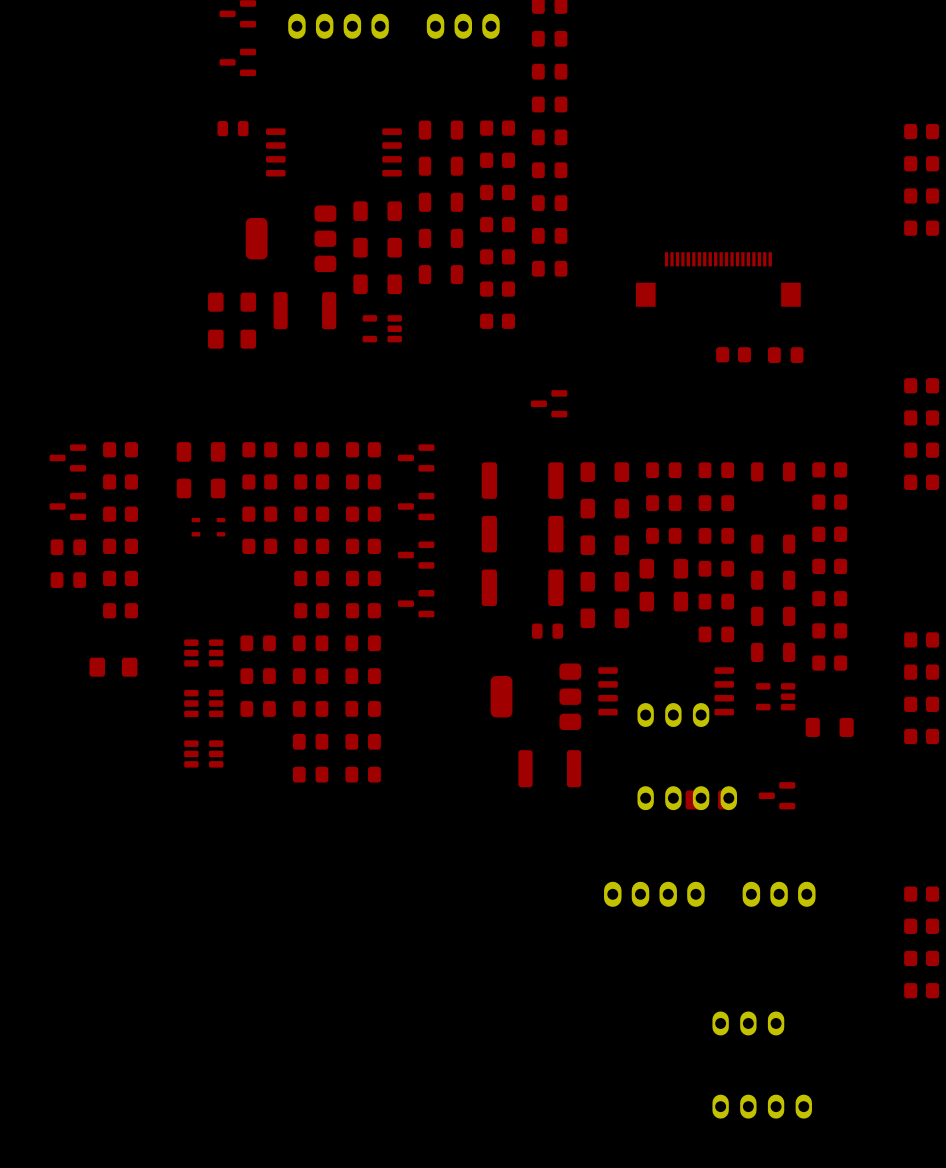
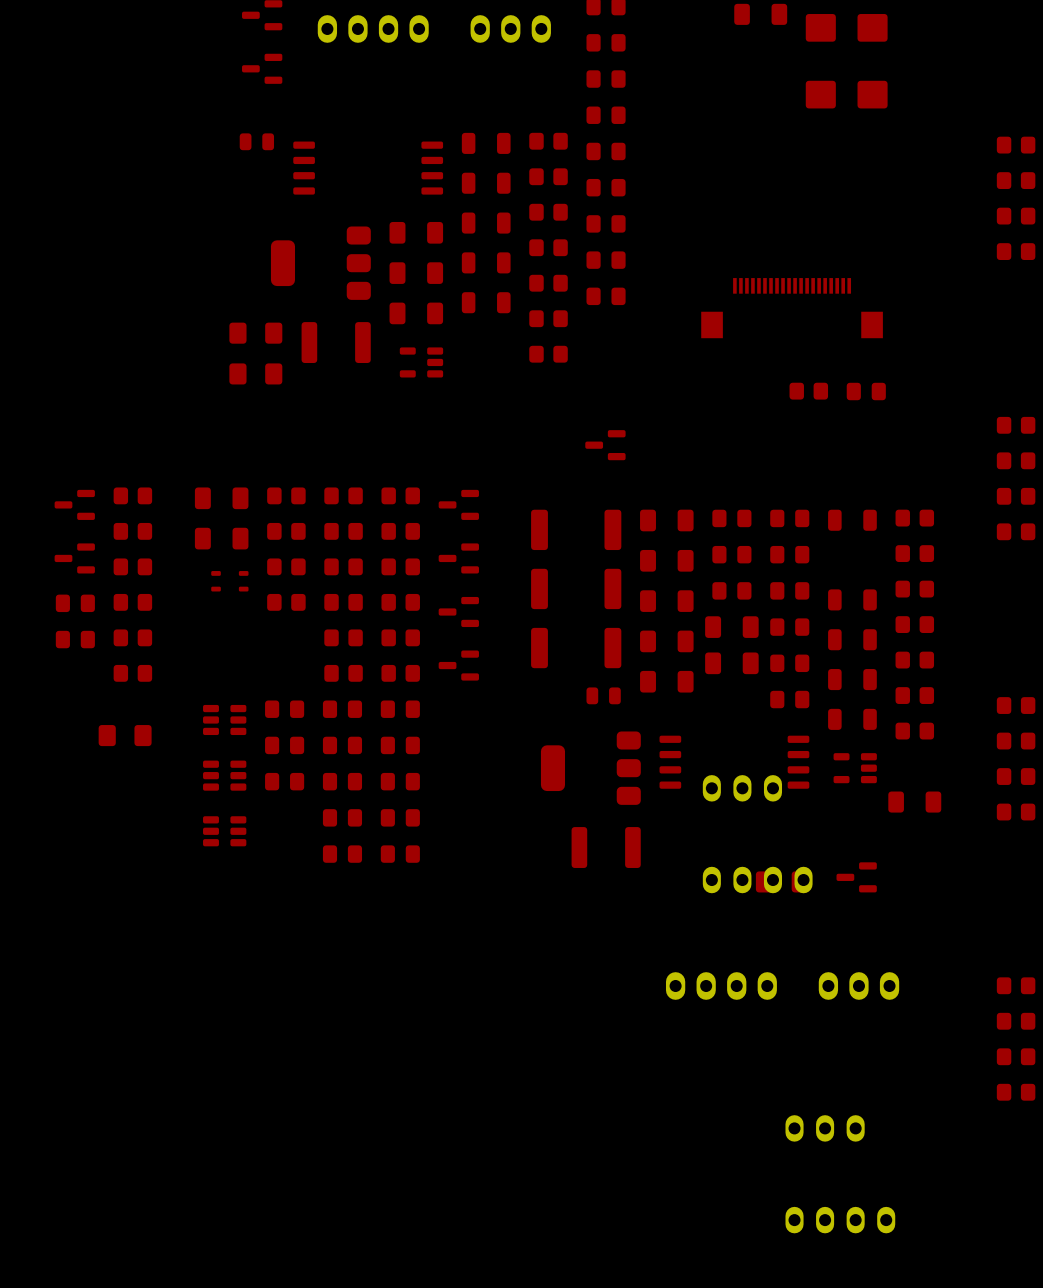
part: none -> (760, 14)
part: none -> (846, 27)
part: none -> (846, 94)

